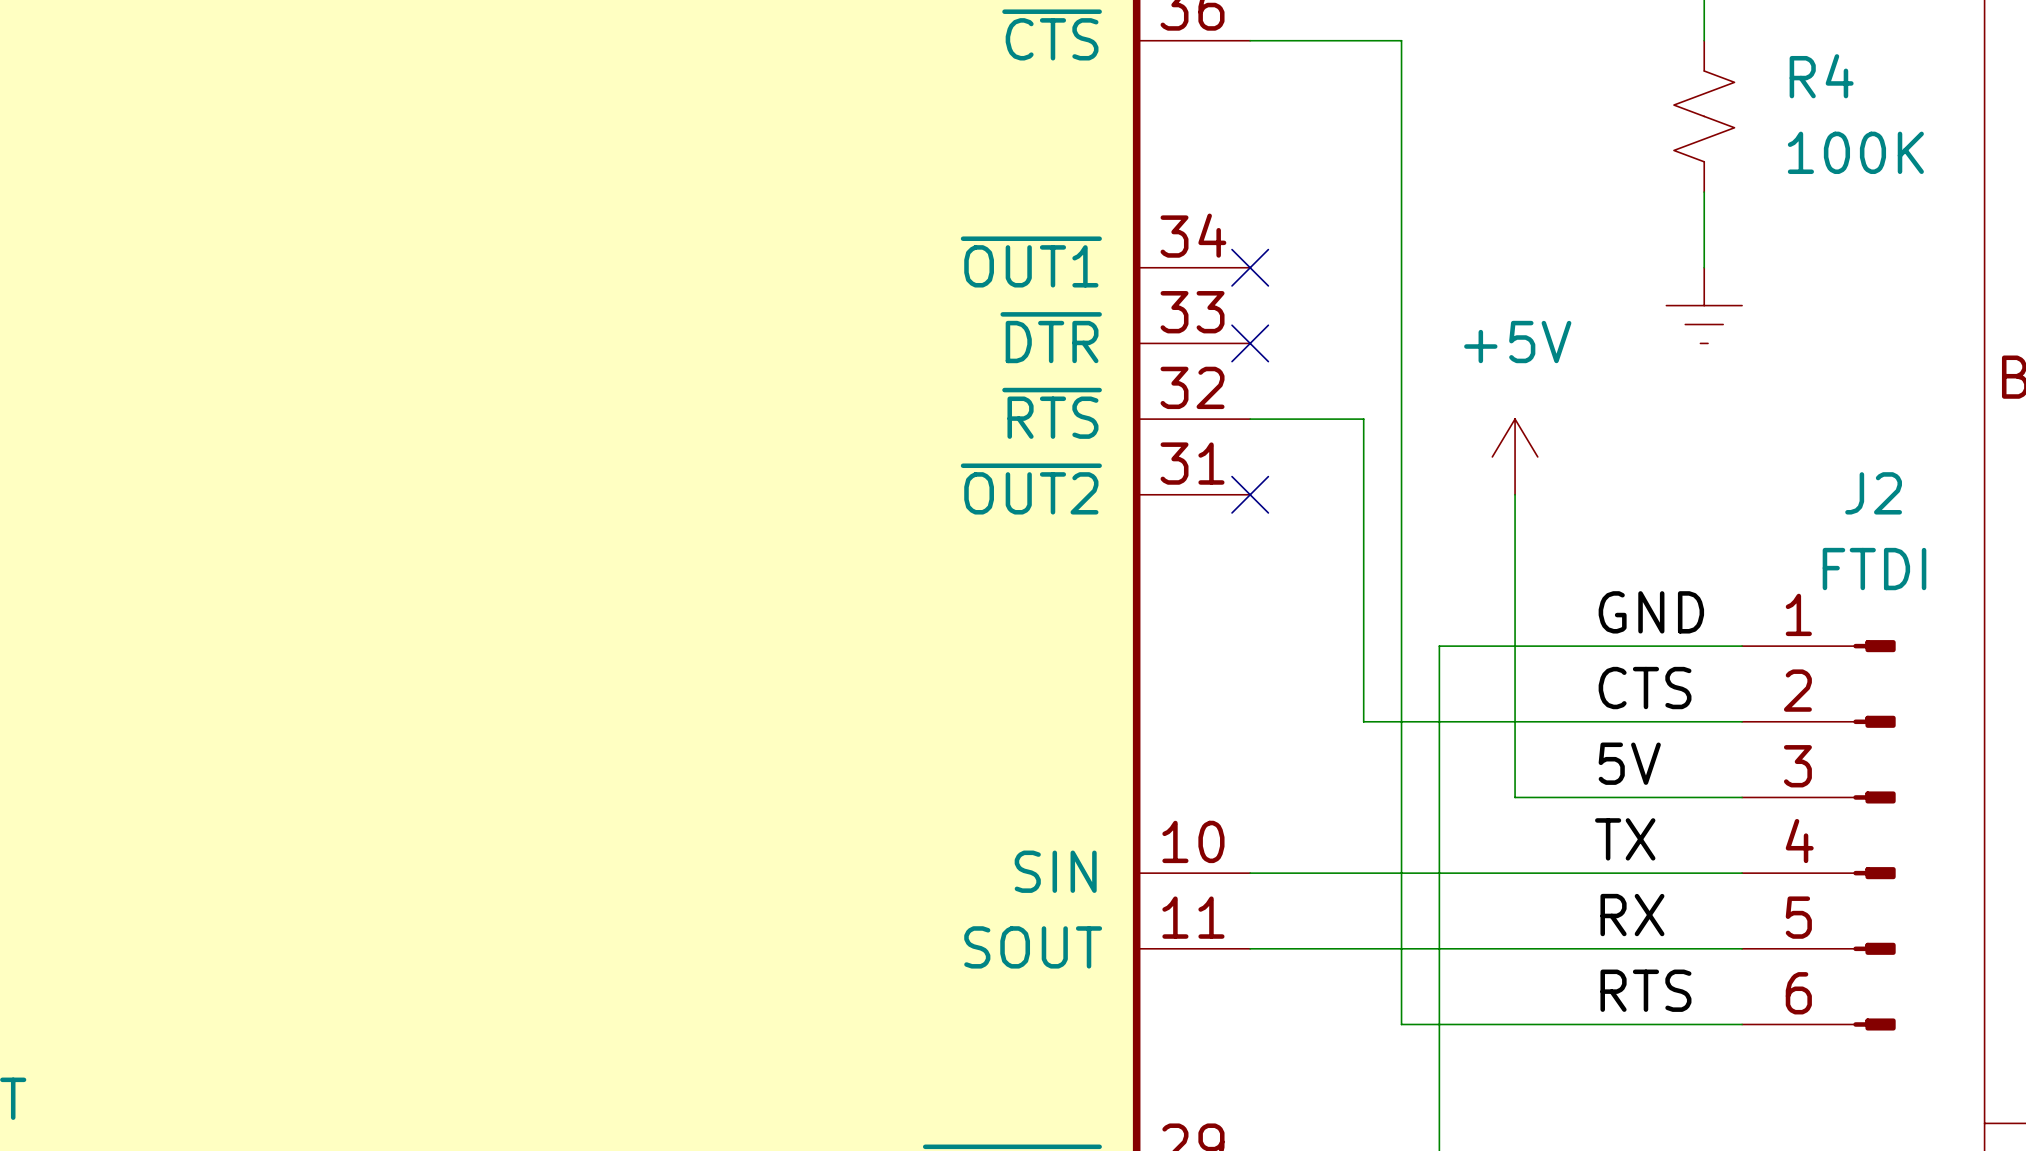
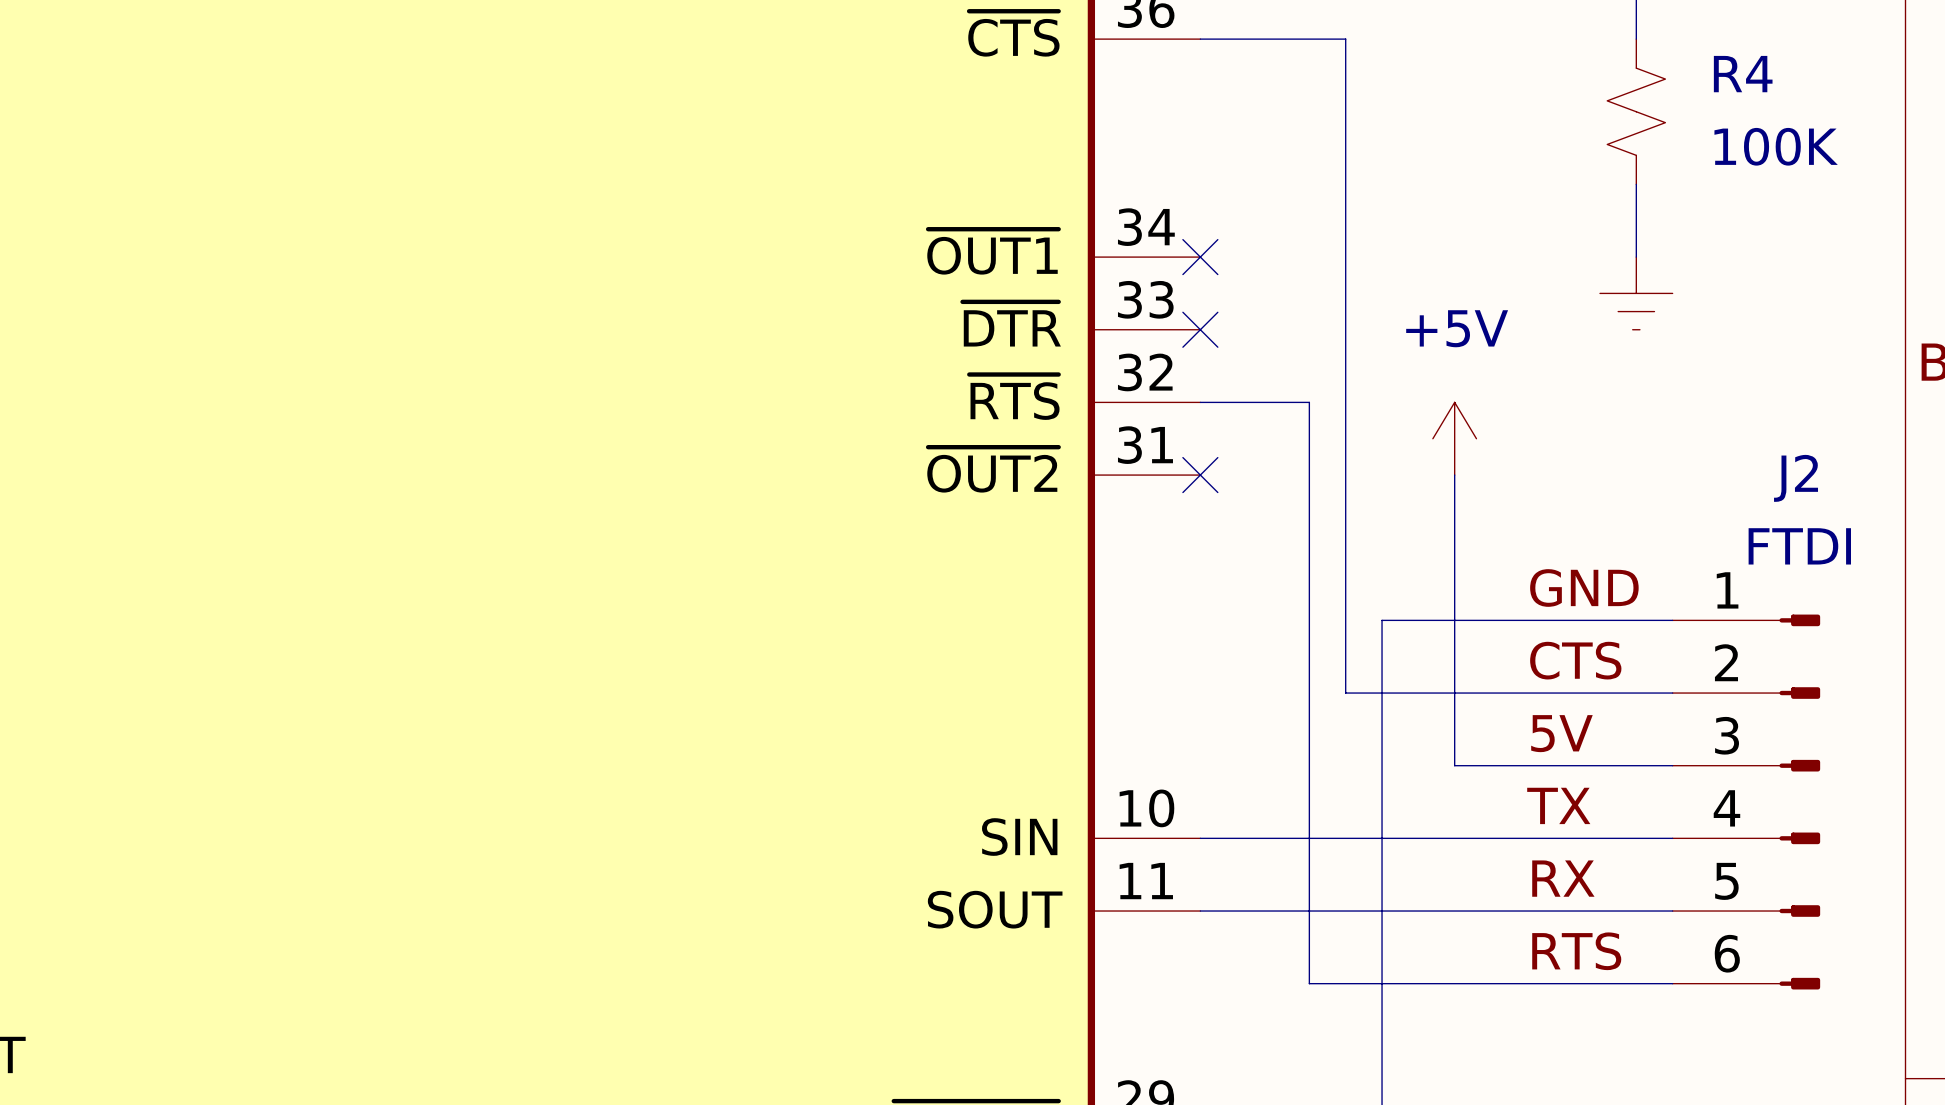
wire: (1363, 721) (1401, 721) (1401, 1024) -> (1309, 693) (1309, 983) (1345, 983)

